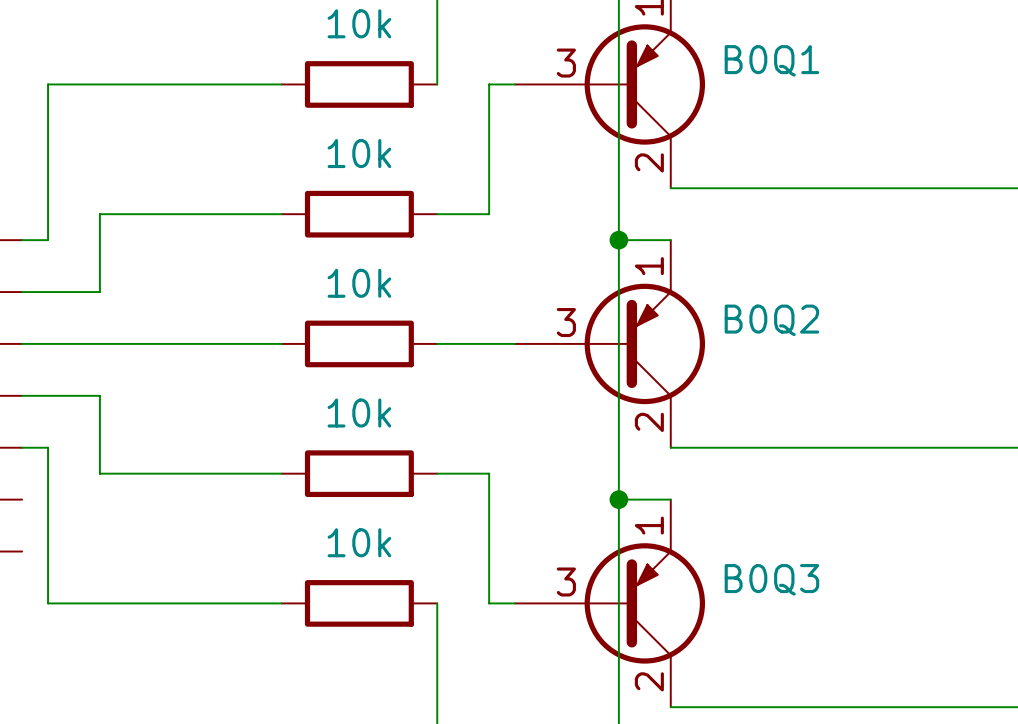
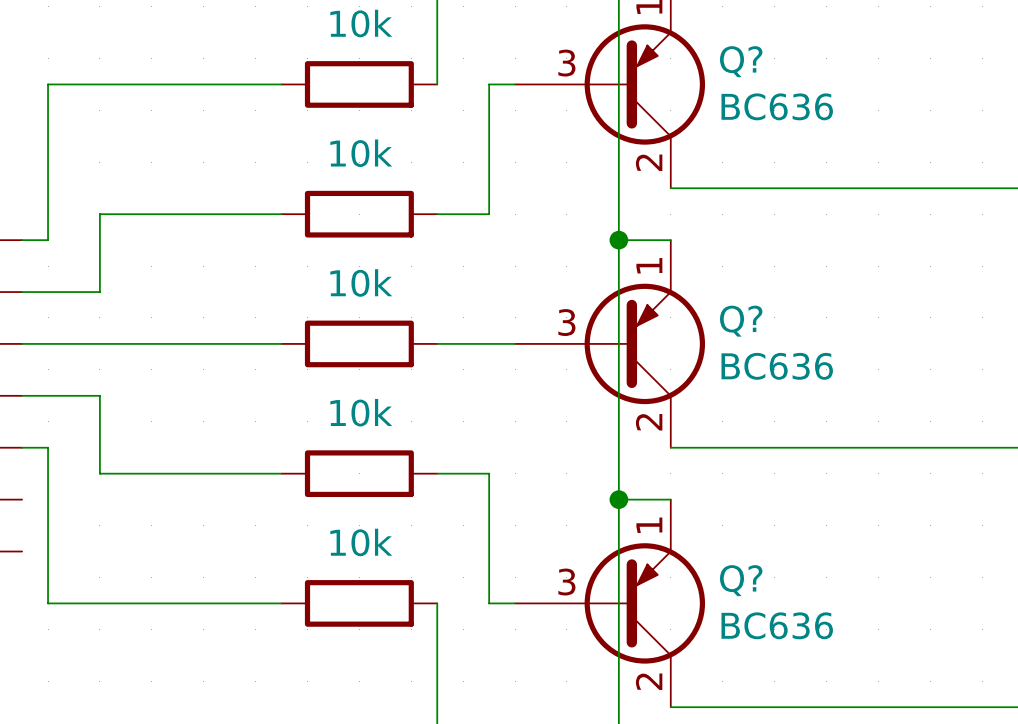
B0Q1 name: B0Q1 (771, 60) -> Q? (741, 61)
B0Q1 value: none -> BC636 (777, 106)
B0Q2 name: B0Q2 (771, 320) -> Q? (741, 321)
B0Q2 value: none -> BC636 (777, 366)
B0Q3 name: B0Q3 (771, 579) -> Q? (741, 580)
B0Q3 value: none -> BC636 (777, 625)

